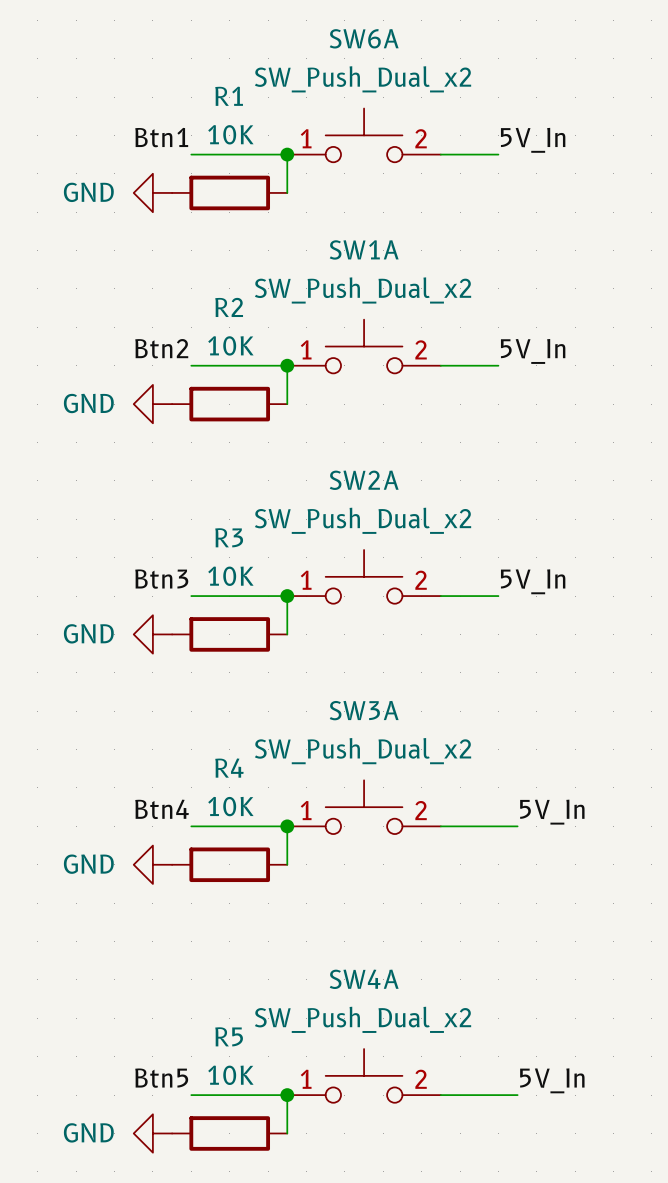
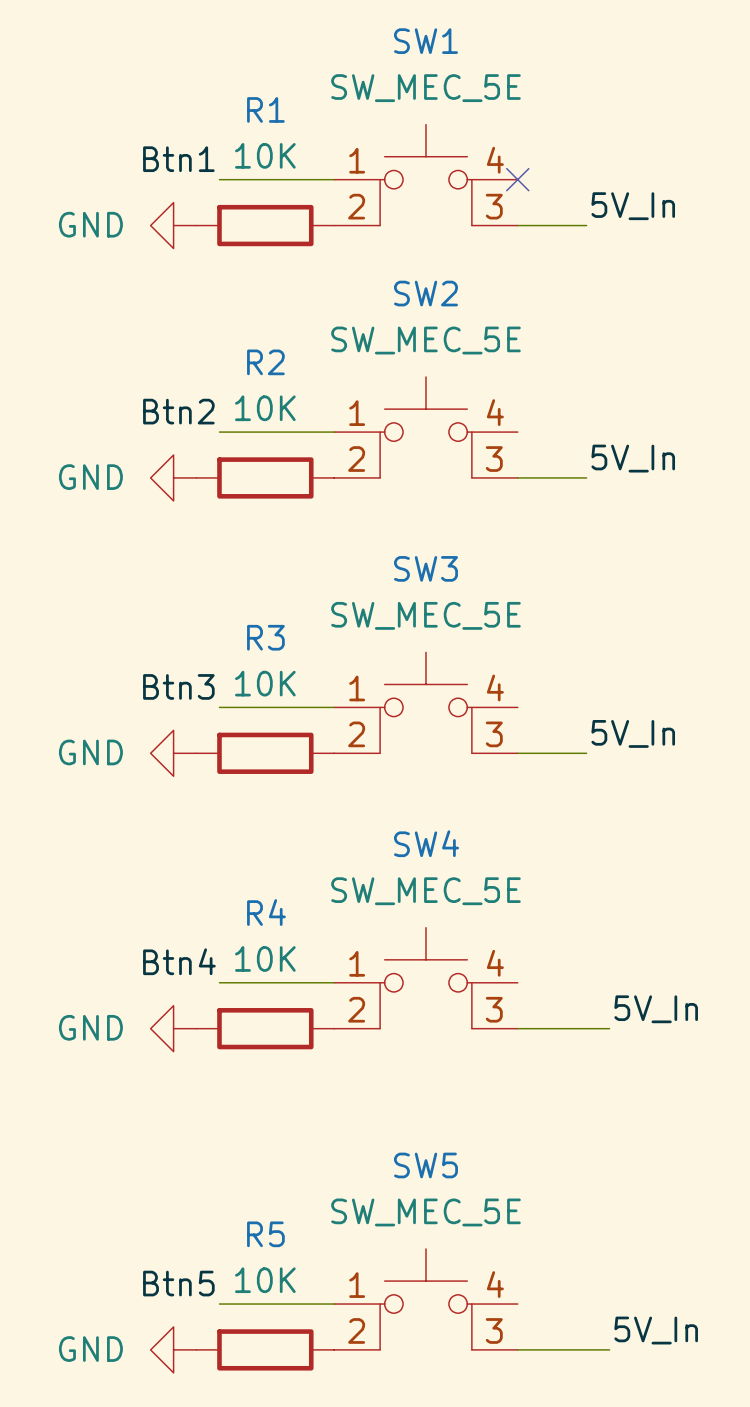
SW6A: SW_Push_Dual_x2 (364, 135) -> none
label position: 5V_In (533, 140) -> 5V_In (633, 206)
SW1: none -> SW_MEC_5E (425, 175)
wire: (287, 154) (287, 192) -> none
junction: (287, 154) -> none
wire: (440, 154) (498, 154) -> (517, 225) (586, 225)
no-connect mark: none -> (517, 179)
SW1A: SW_Push_Dual_x2 (364, 346) -> none
label position: 5V_In (533, 351) -> 5V_In (633, 458)
SW2: none -> SW_MEC_5E (425, 427)
wire: (287, 365) (287, 404) -> none
junction: (287, 365) -> none
wire: (440, 365) (498, 365) -> (517, 477) (586, 477)
SW2A: SW_Push_Dual_x2 (364, 576) -> none
label position: 5V_In (533, 581) -> 5V_In (633, 733)
SW3: none -> SW_MEC_5E (425, 702)
wire: (287, 596) (287, 634) -> none
junction: (287, 596) -> none
wire: (440, 596) (498, 596) -> (517, 753) (586, 753)
SW3A: SW_Push_Dual_x2 (364, 807) -> none
label position: 5V_In (552, 812) -> 5V_In (656, 1009)
SW4: none -> SW_MEC_5E (425, 978)
wire: (287, 826) (287, 864) -> none
junction: (287, 826) -> none
wire: (440, 826) (517, 826) -> (517, 1028) (609, 1028)
SW4A: SW_Push_Dual_x2 (364, 1075) -> none
label position: 5V_In (552, 1080) -> 5V_In (656, 1330)
SW5: none -> SW_MEC_5E (425, 1299)
wire: (287, 1095) (287, 1133) -> none
junction: (287, 1095) -> none
wire: (440, 1095) (517, 1095) -> (517, 1349) (609, 1349)

